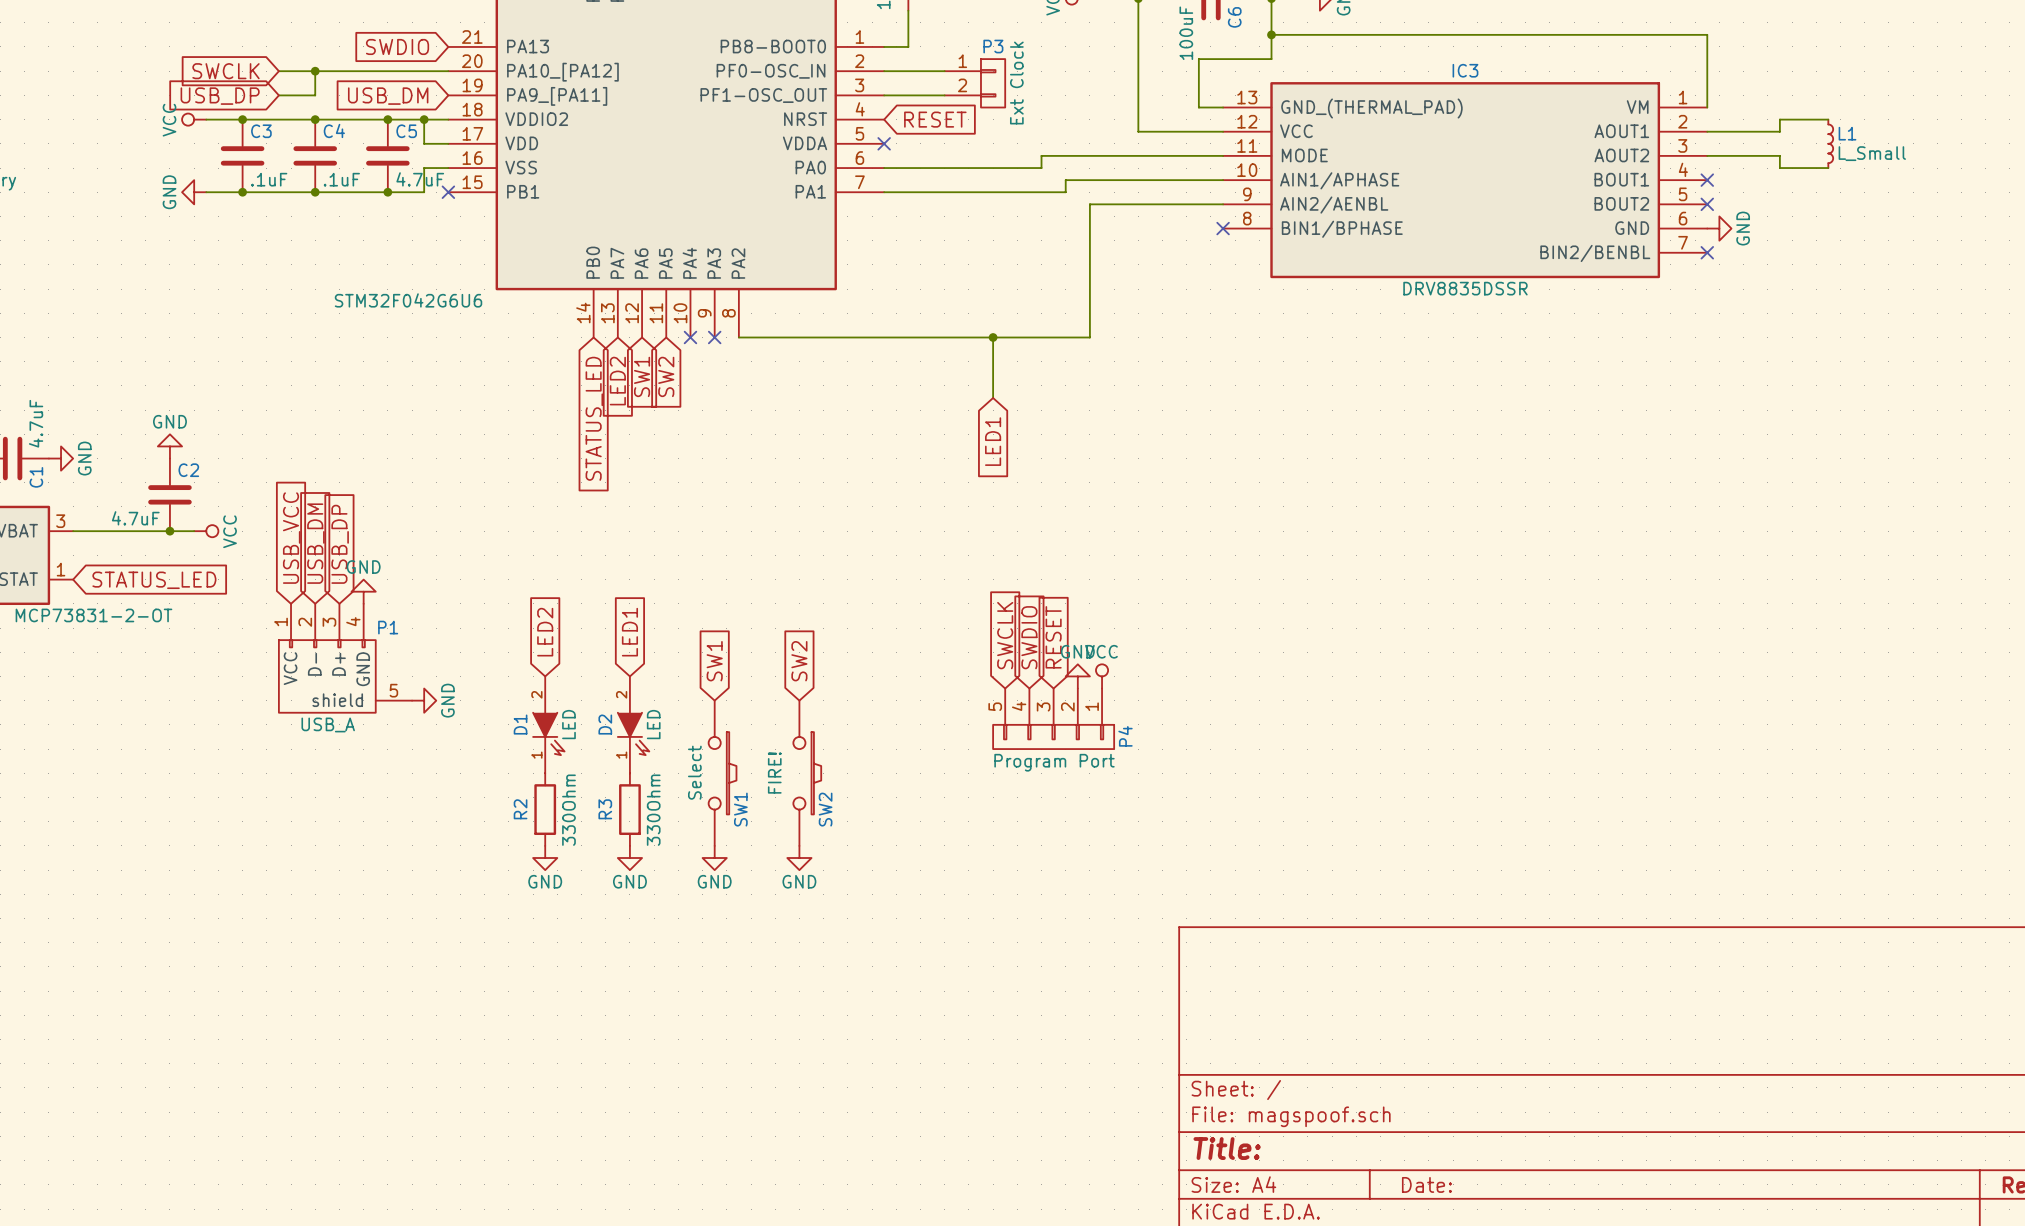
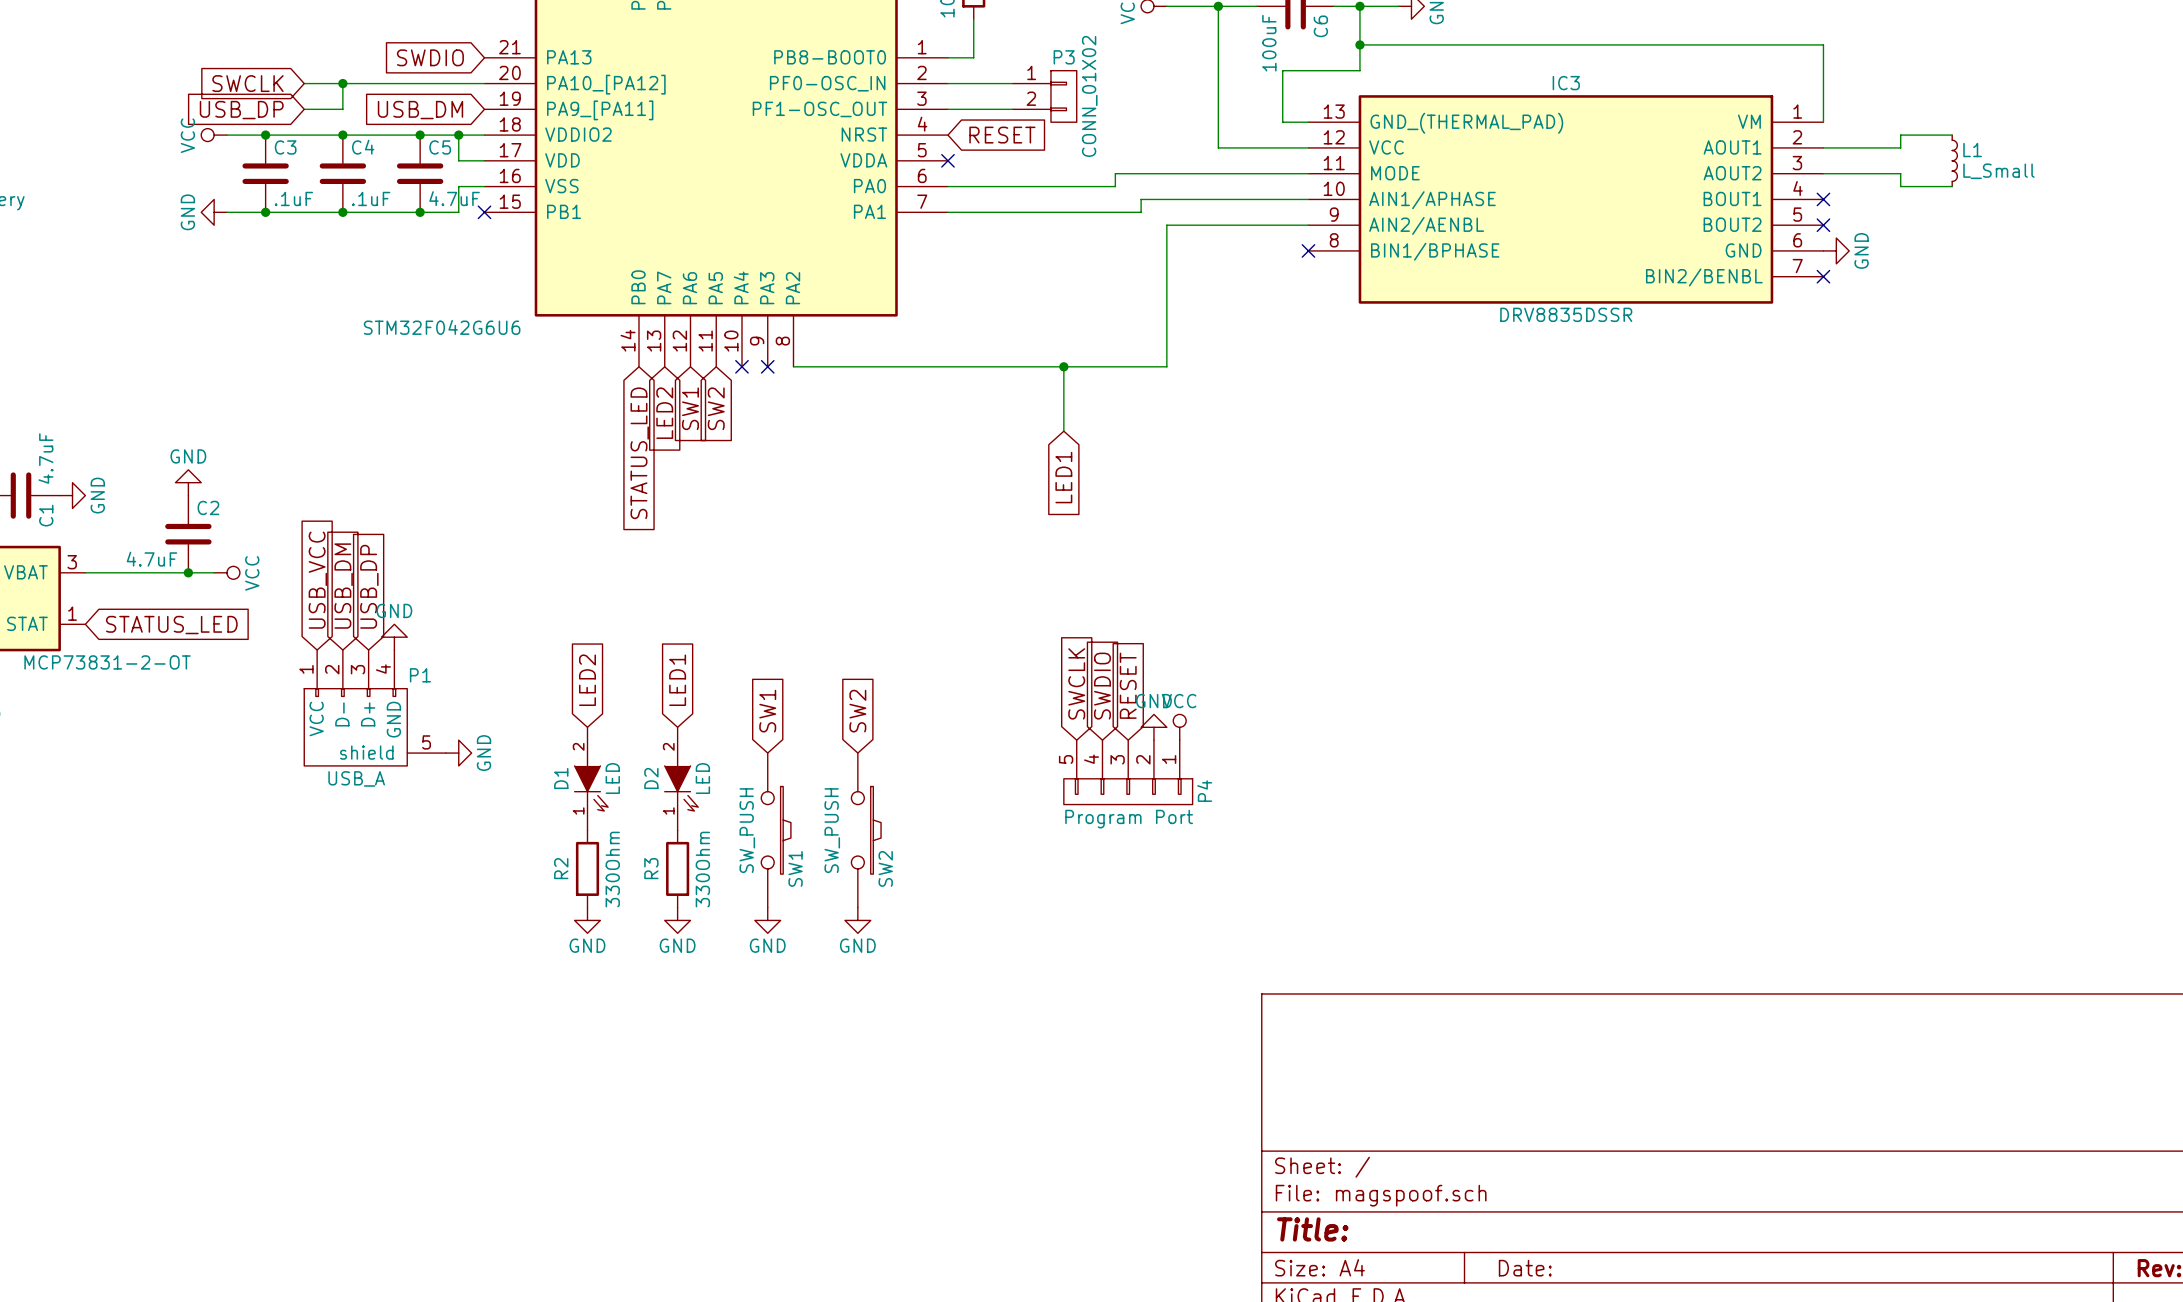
P3 value: Ext Clock (1016, 83) -> CONN_01X02 (1089, 96)
SW1 value: Select (694, 772) -> SW_PUSH (747, 830)
SW2 value: FIRE! (774, 772) -> SW_PUSH (832, 830)

